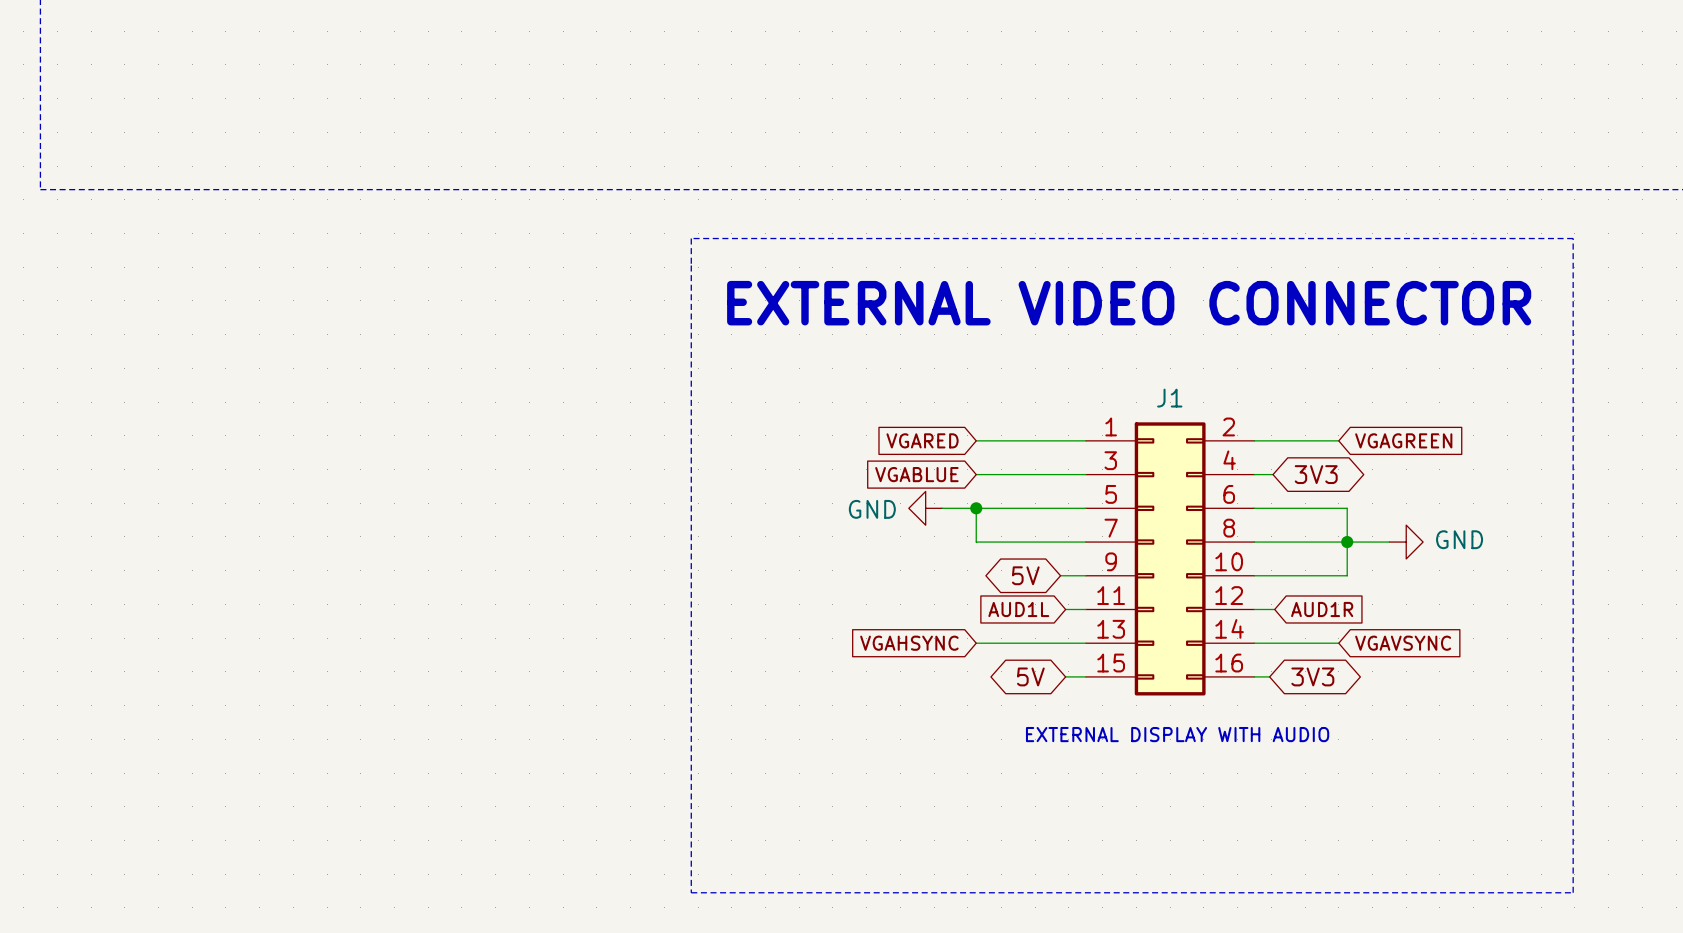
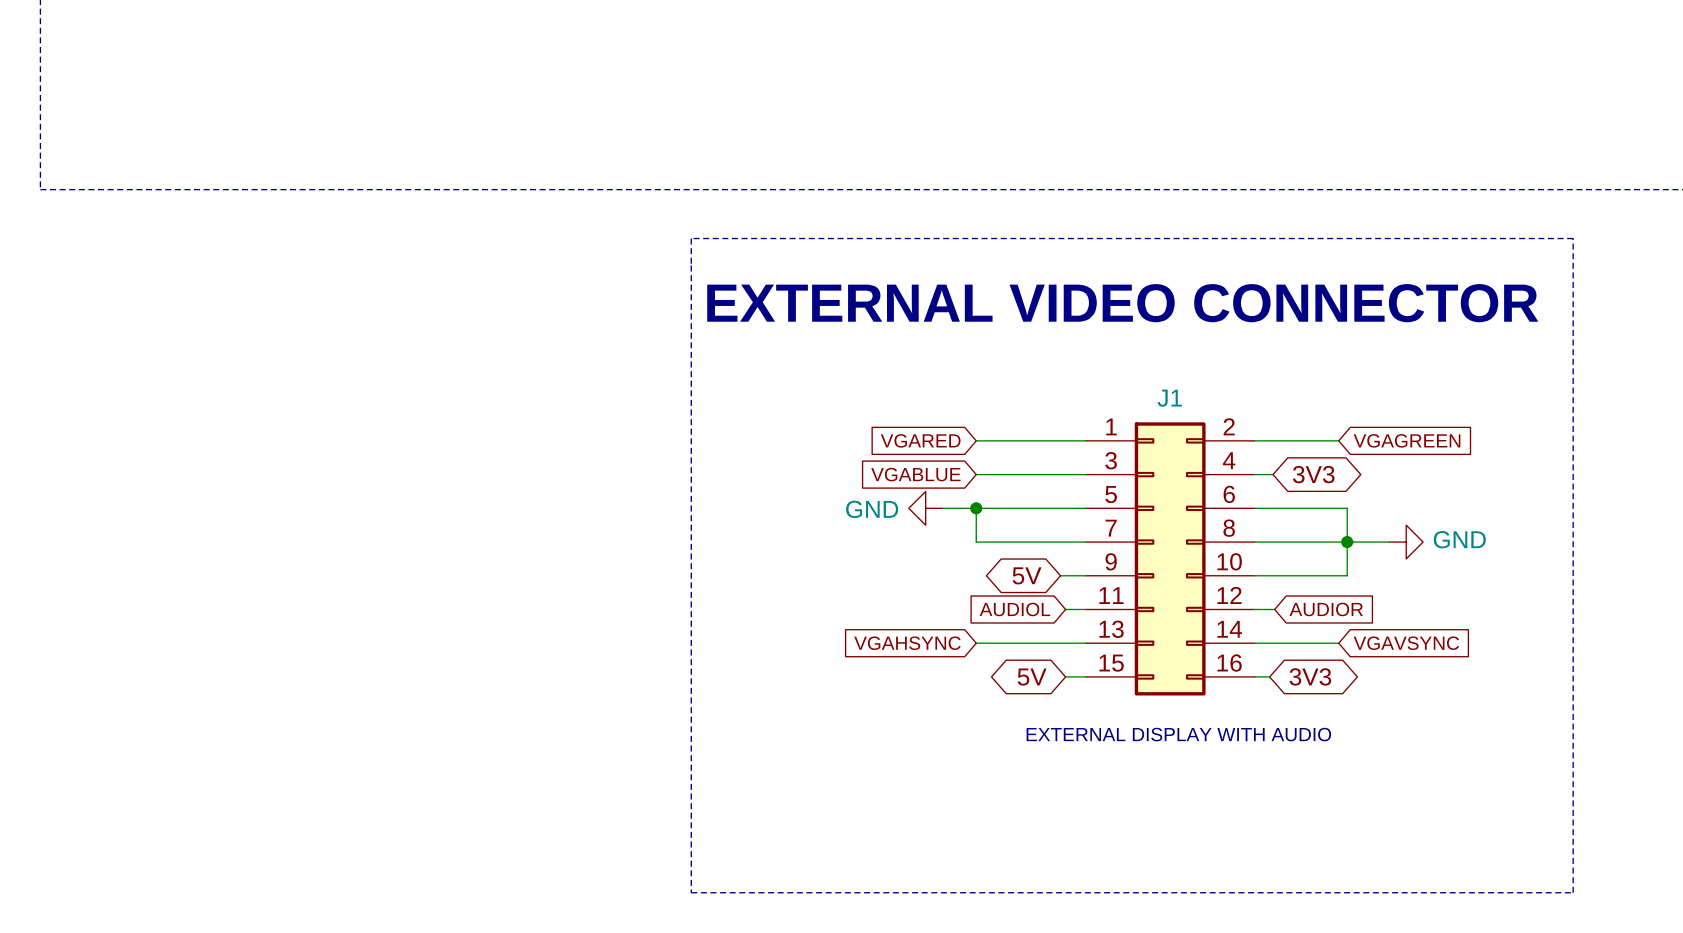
global label: AUD1L (1018, 609) -> AUDIOL (1014, 609)
global label: AUD1R (1322, 609) -> AUDIOR (1326, 609)

